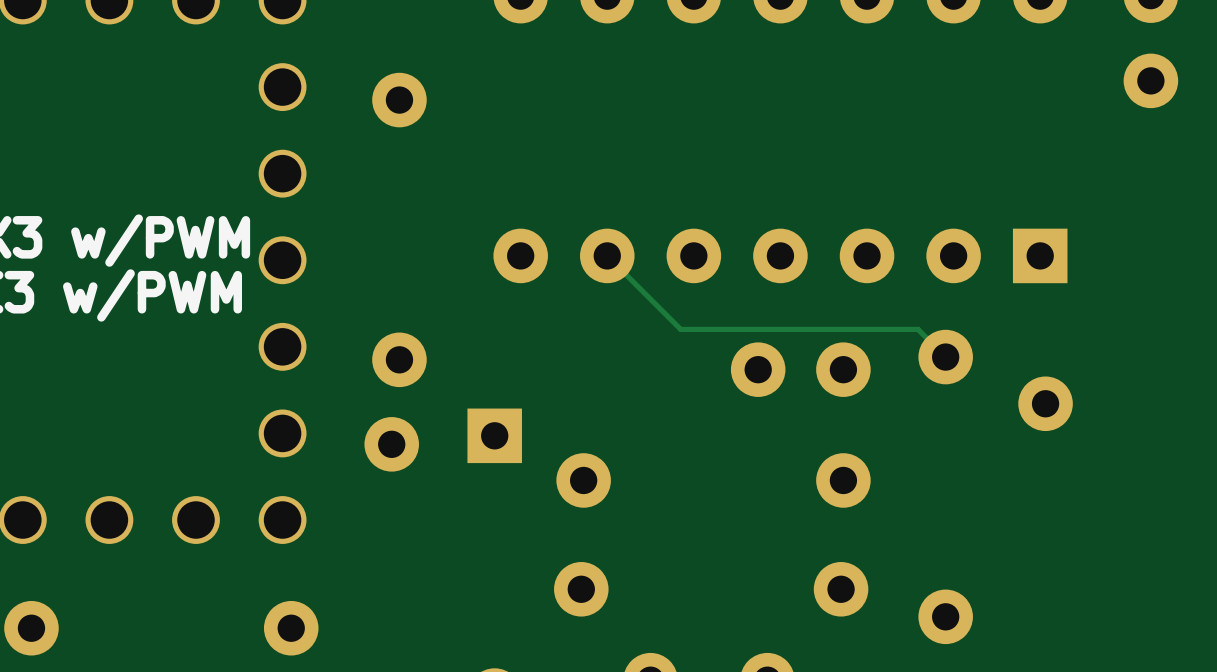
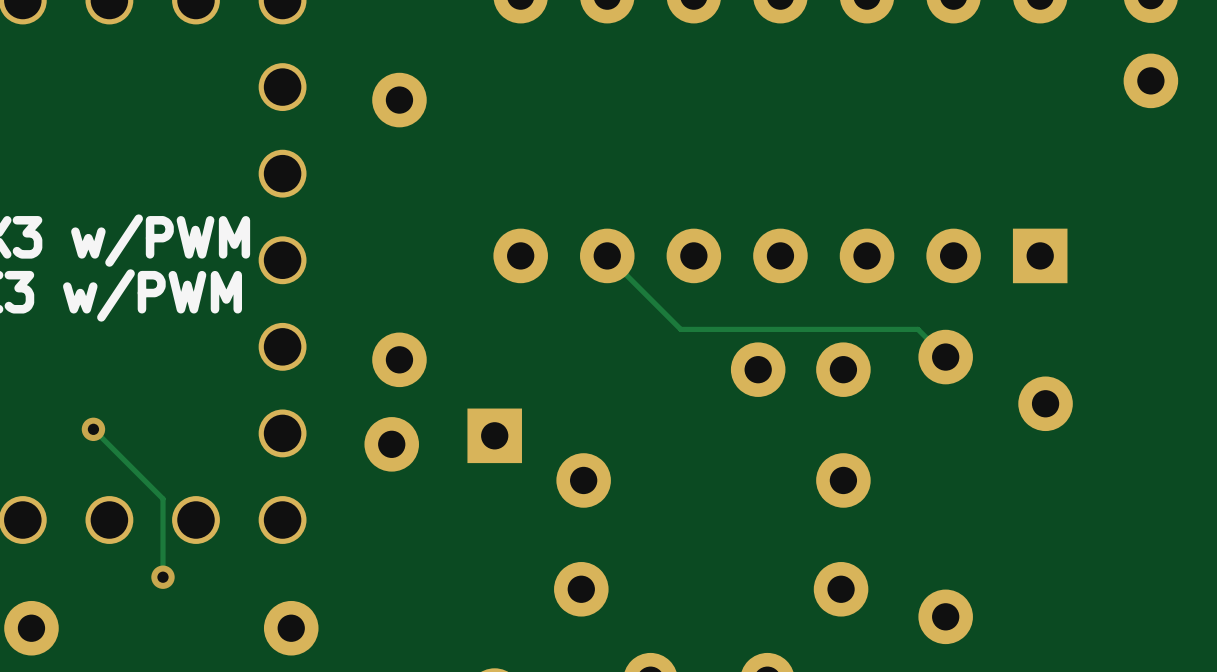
track: none -> (93, 429) (162, 498) (162, 577)
via: none -> (93, 429)
via: none -> (162, 577)

